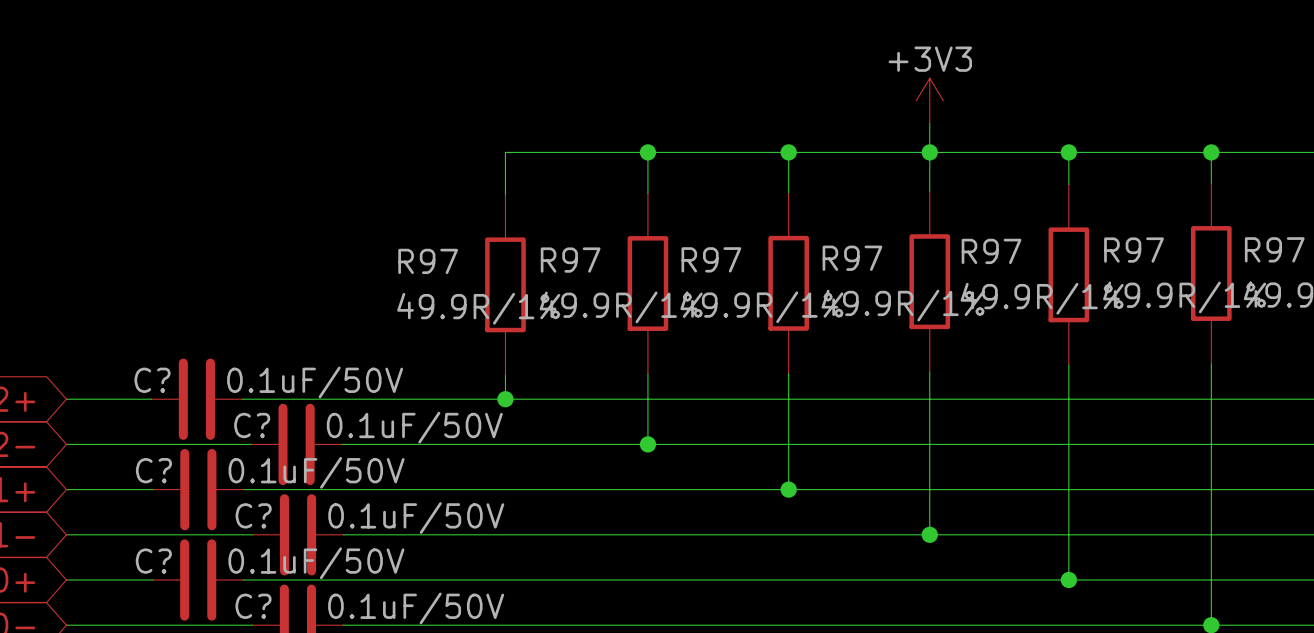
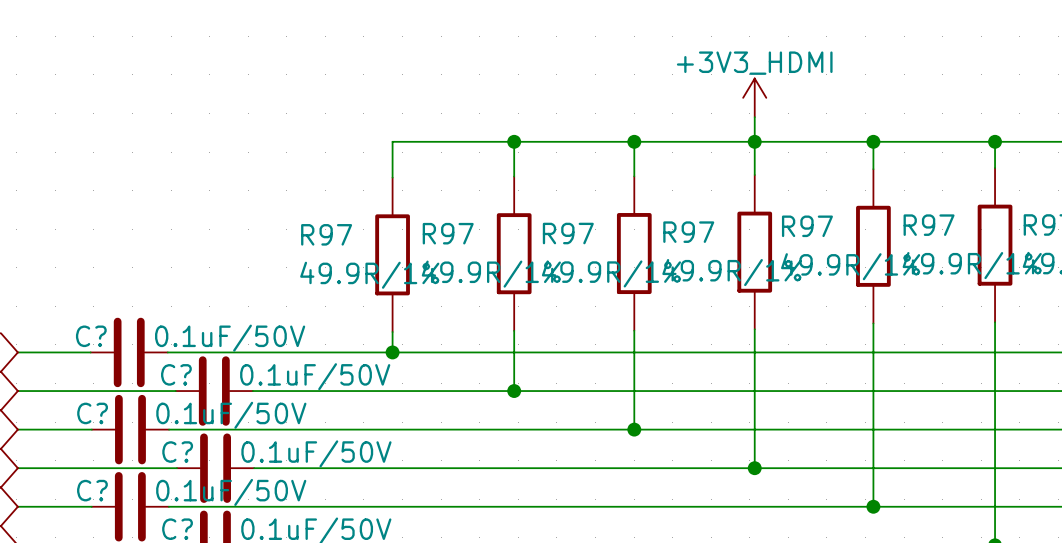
power symbol: +3V3 (929, 100) -> +3V3_HDMI (754, 97)

